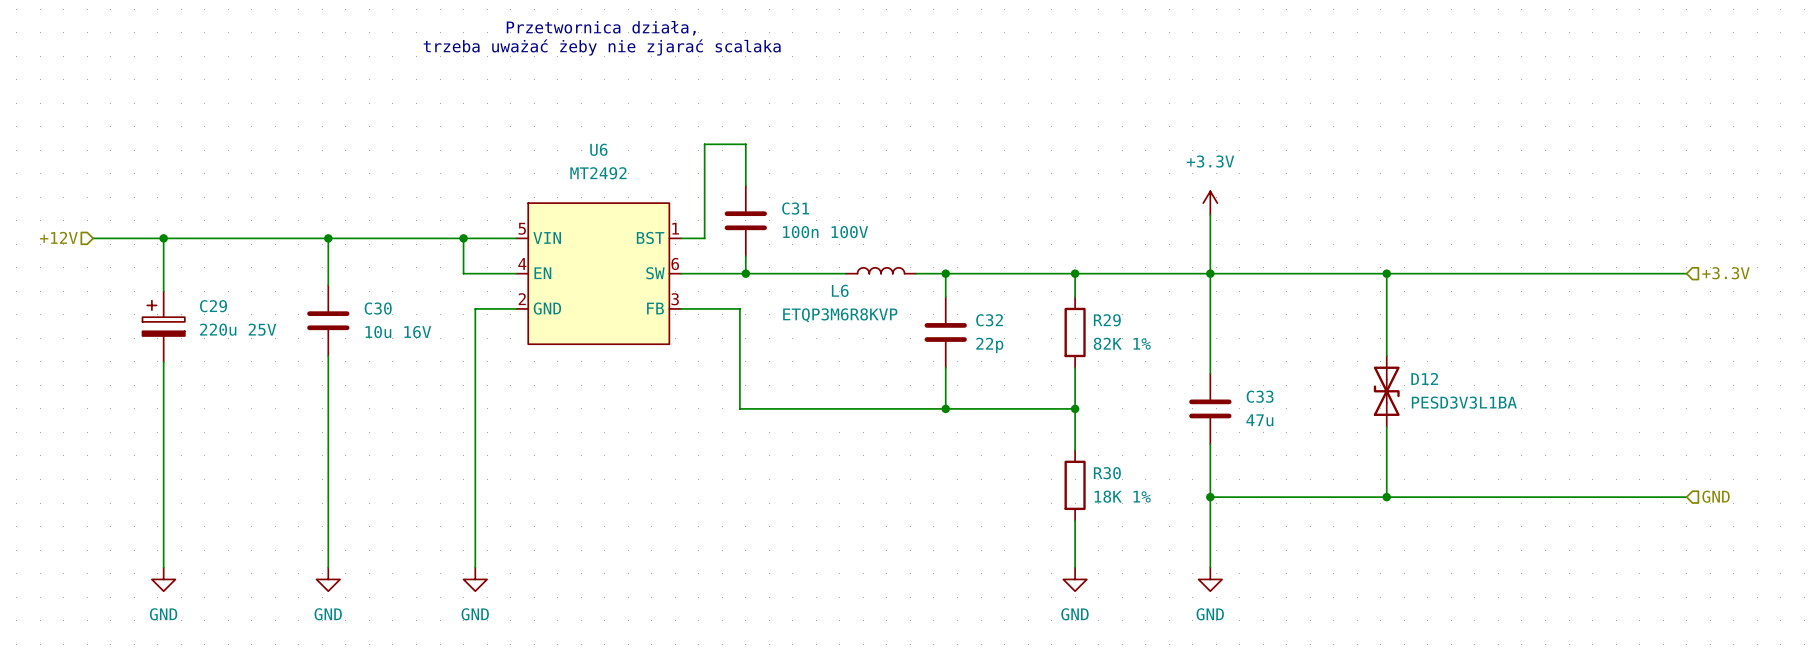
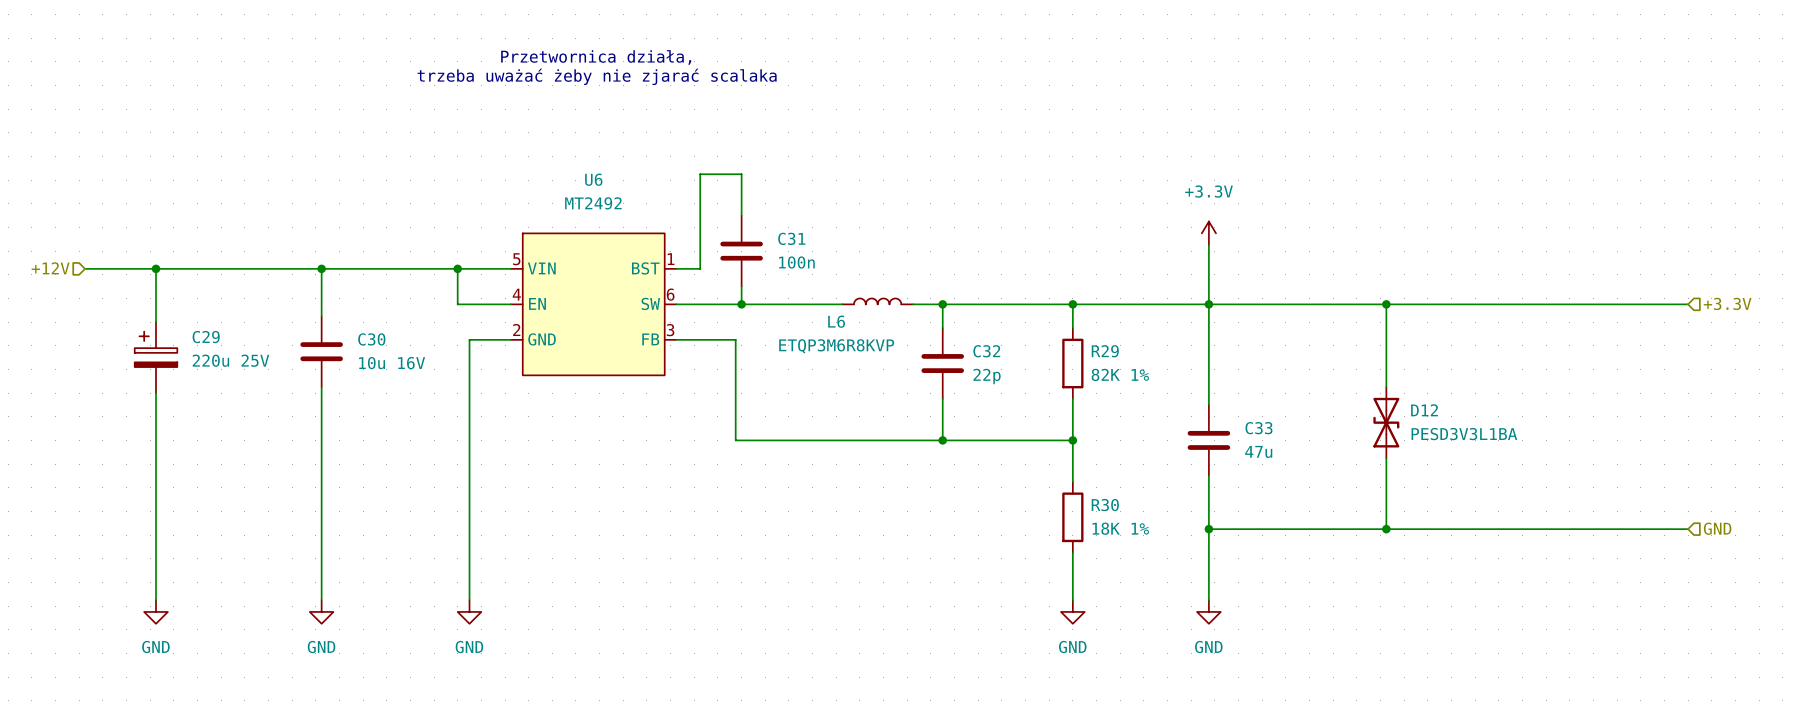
C31 value: 100n 100V (825, 232) -> 100n (796, 262)

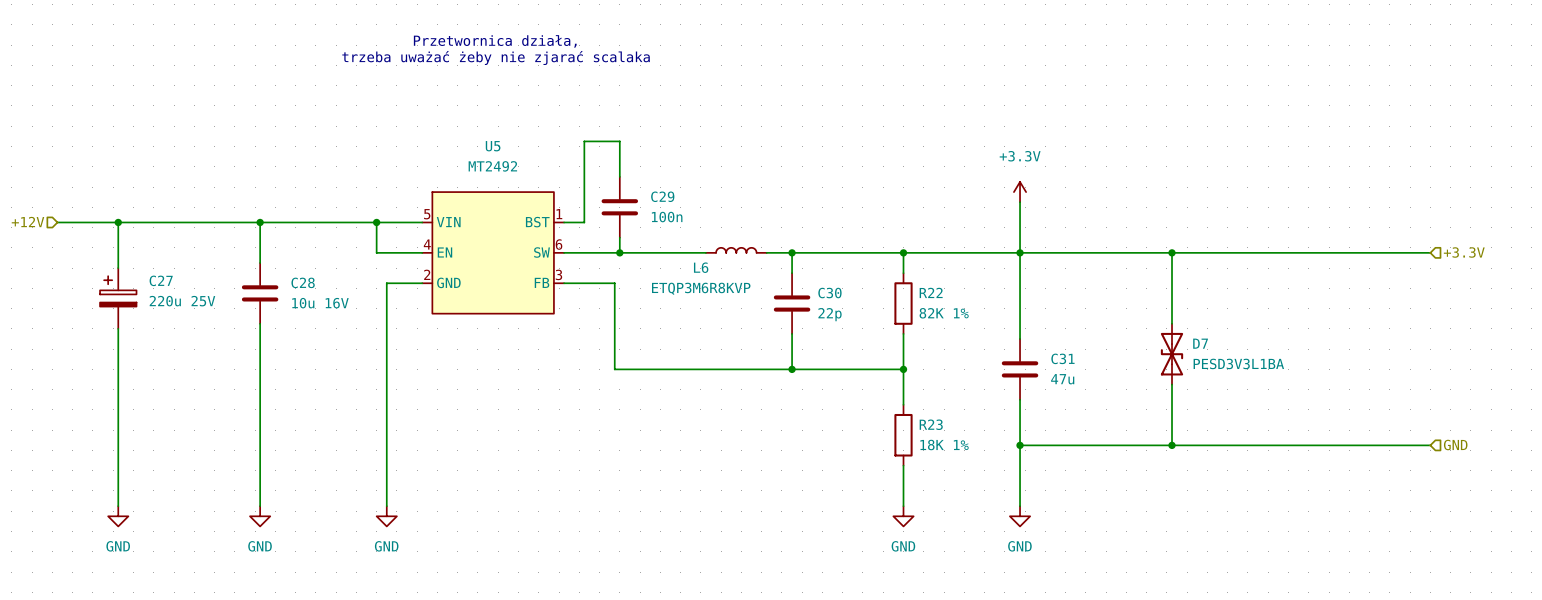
U6 name: U6 (593, 179) -> U5 (493, 146)
C31 name: C31 (791, 238) -> C29 (662, 196)
C29 name: C29 (206, 337) -> C27 (161, 280)
C30 name: C30 (371, 339) -> C28 (303, 282)
C32 name: C32 (986, 351) -> C30 (829, 293)
R29 name: R29 (1105, 351) -> R22 (931, 292)
D12 name: D12 (1424, 410) -> D7 (1200, 343)
C33 name: C33 (1258, 428) -> C31 (1062, 358)
R30 name: R30 (1105, 505) -> R23 (931, 424)

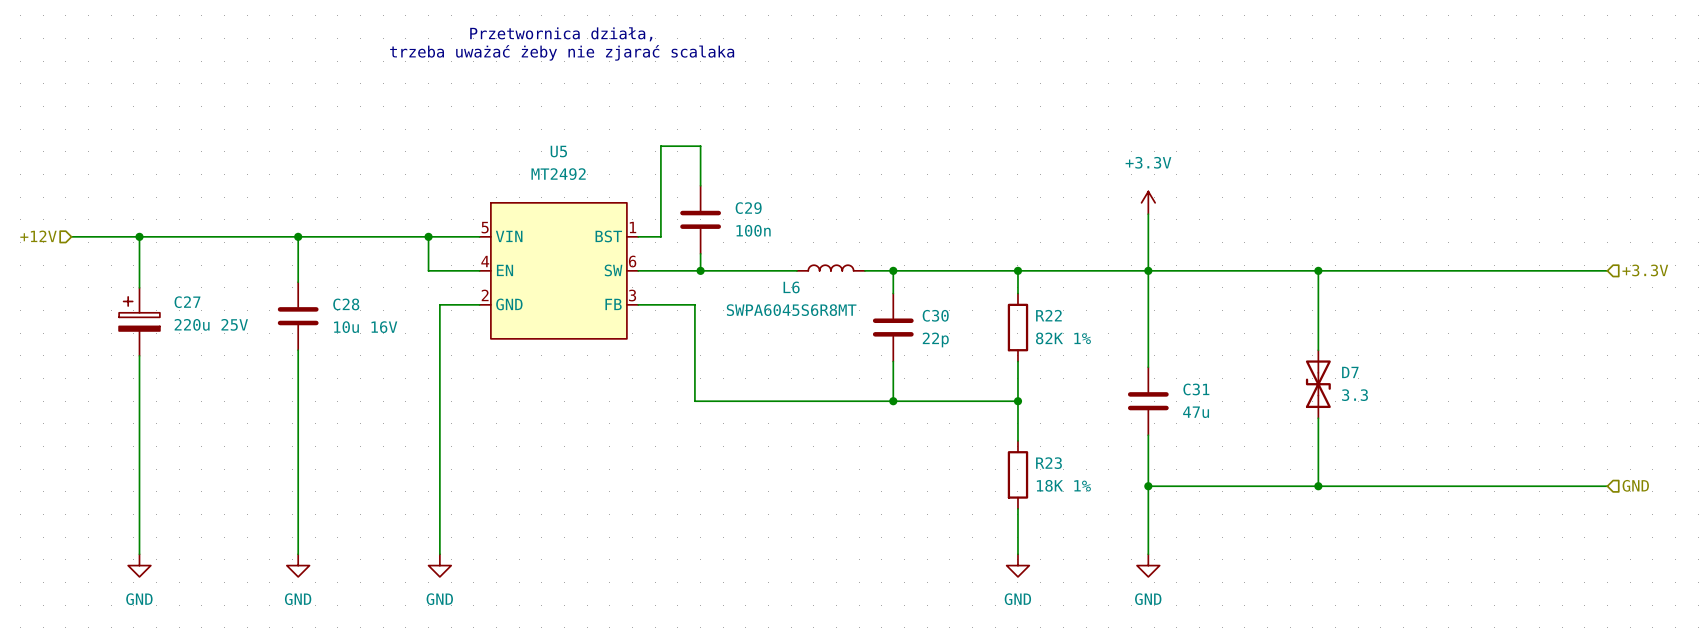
L6 value: ETQP3M6R8KVP (701, 288) -> SWPA6045S6R8MT (791, 310)
D7 value: PESD3V3L1BA (1238, 363) -> 3.3 (1355, 395)

